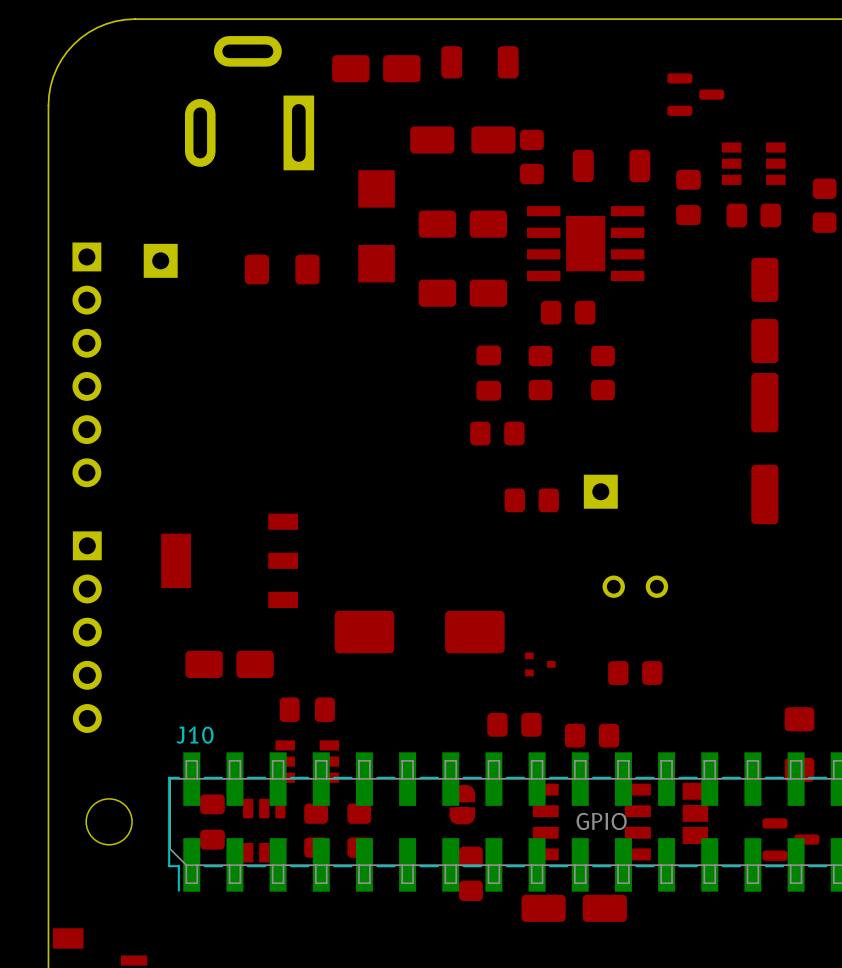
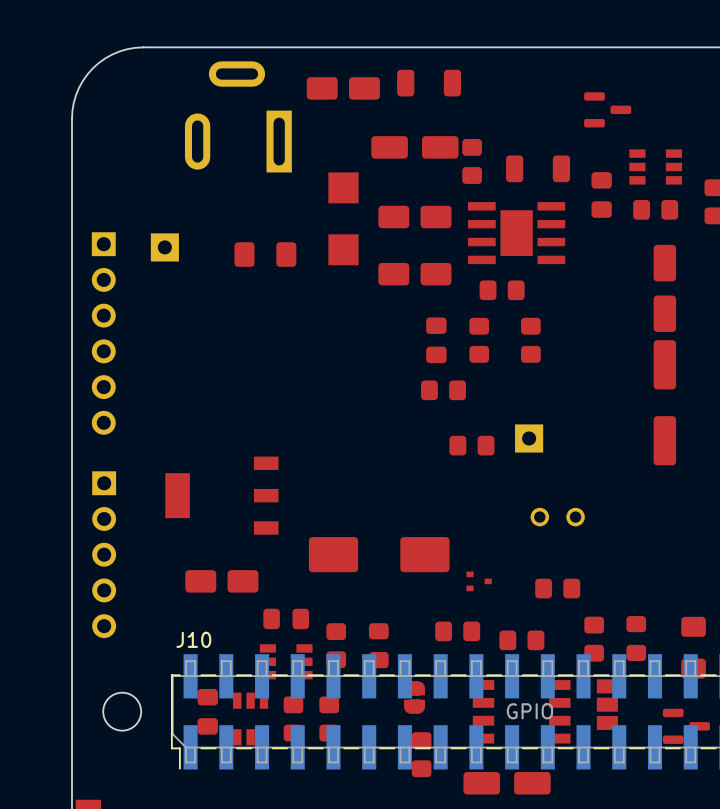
part: none -> (636, 638)
part: none -> (594, 639)
part: none -> (336, 645)
part: none -> (378, 645)

